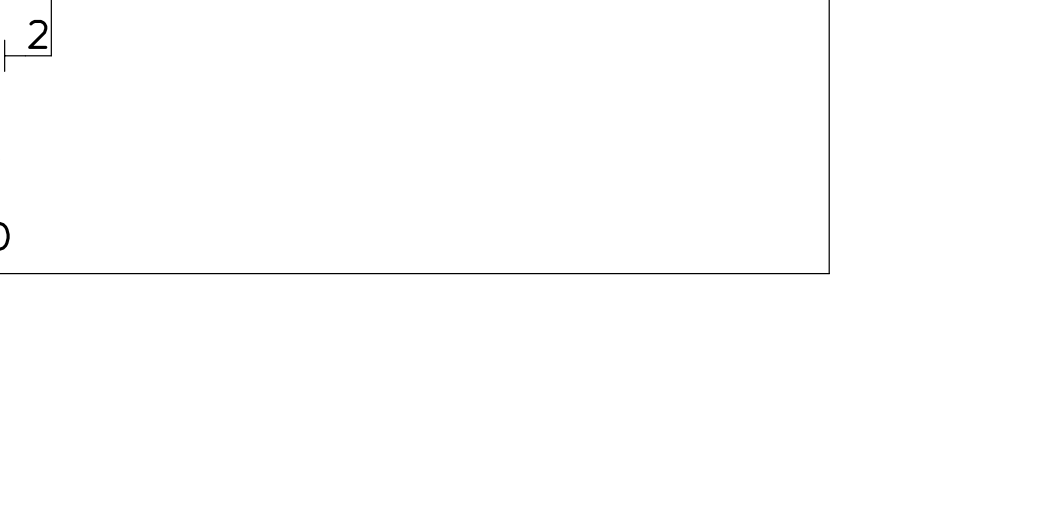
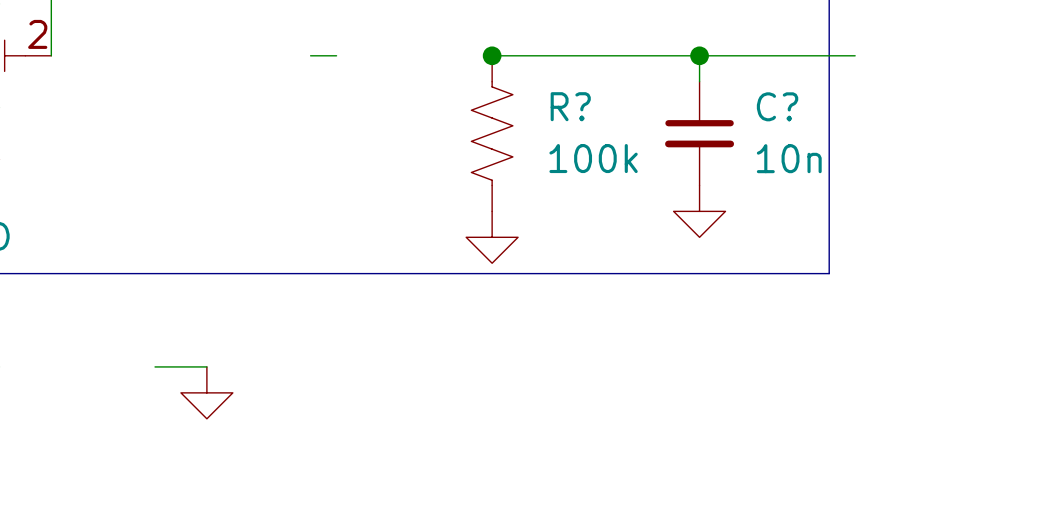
wire: none -> (310, 55) (336, 55)
wire: none -> (492, 55) (855, 55)
junction: none -> (492, 55)
wire: none -> (699, 55) (699, 81)
junction: none -> (699, 55)
R?: none -> 100k (492, 133)
C?: none -> 10n (699, 133)
power symbol: none -> (699, 211)
power symbol: none -> (492, 237)
wire: none -> (155, 366) (206, 366)
power symbol: none -> (206, 392)

